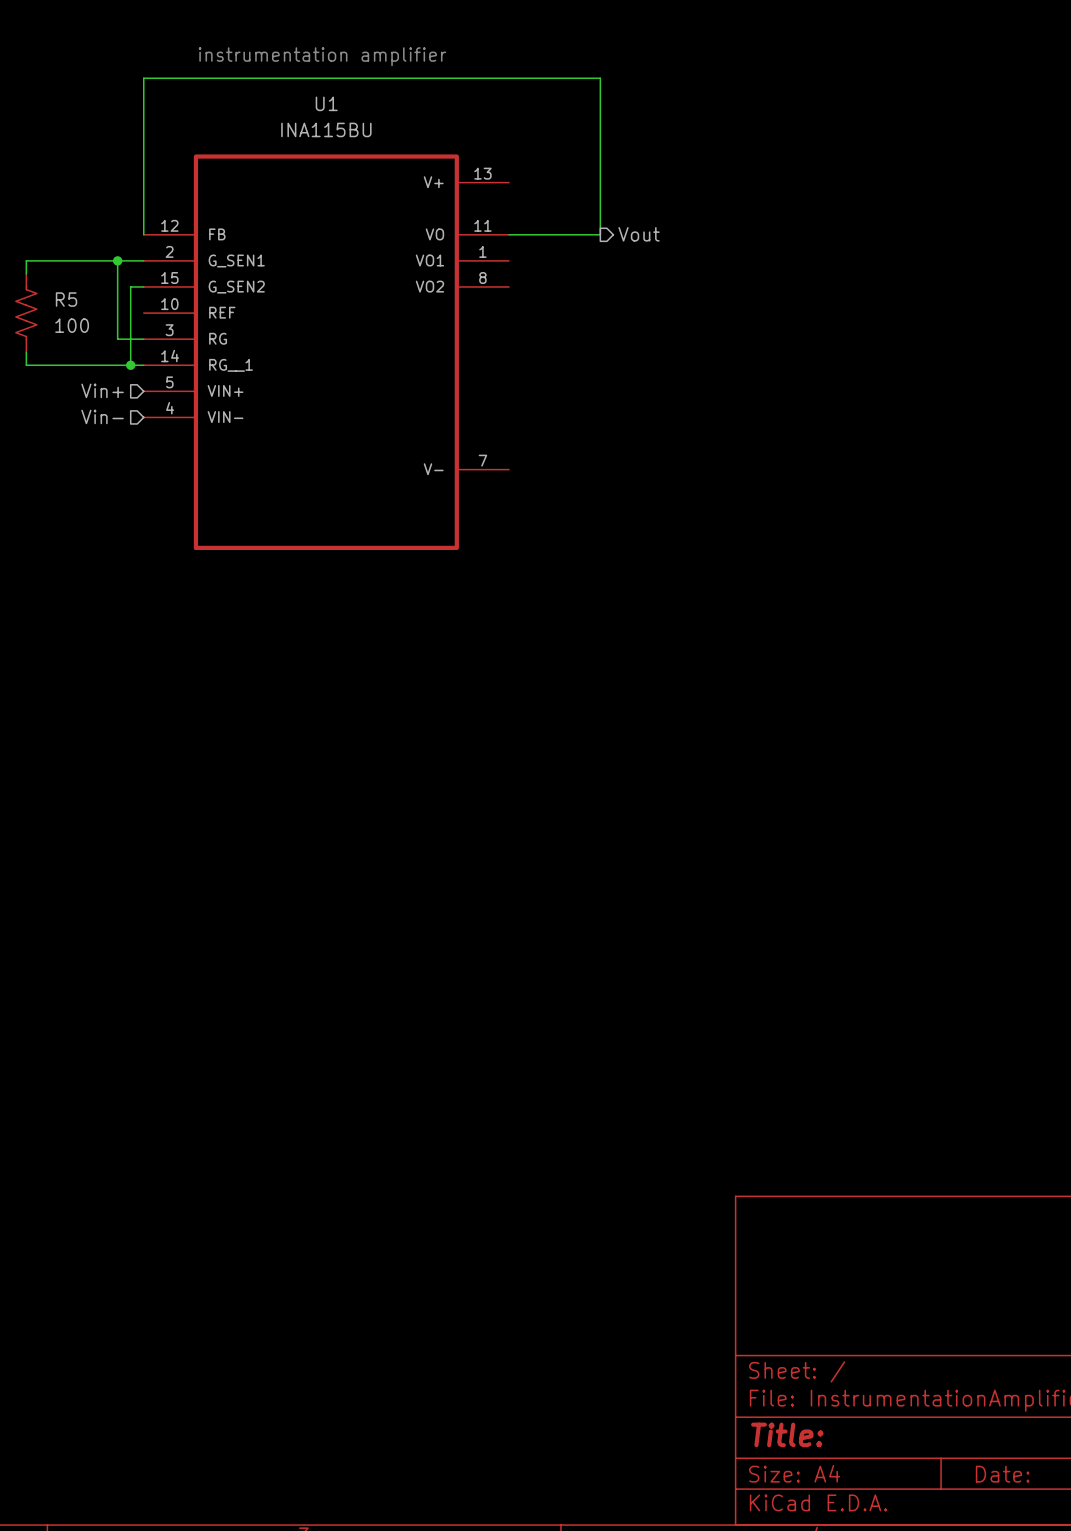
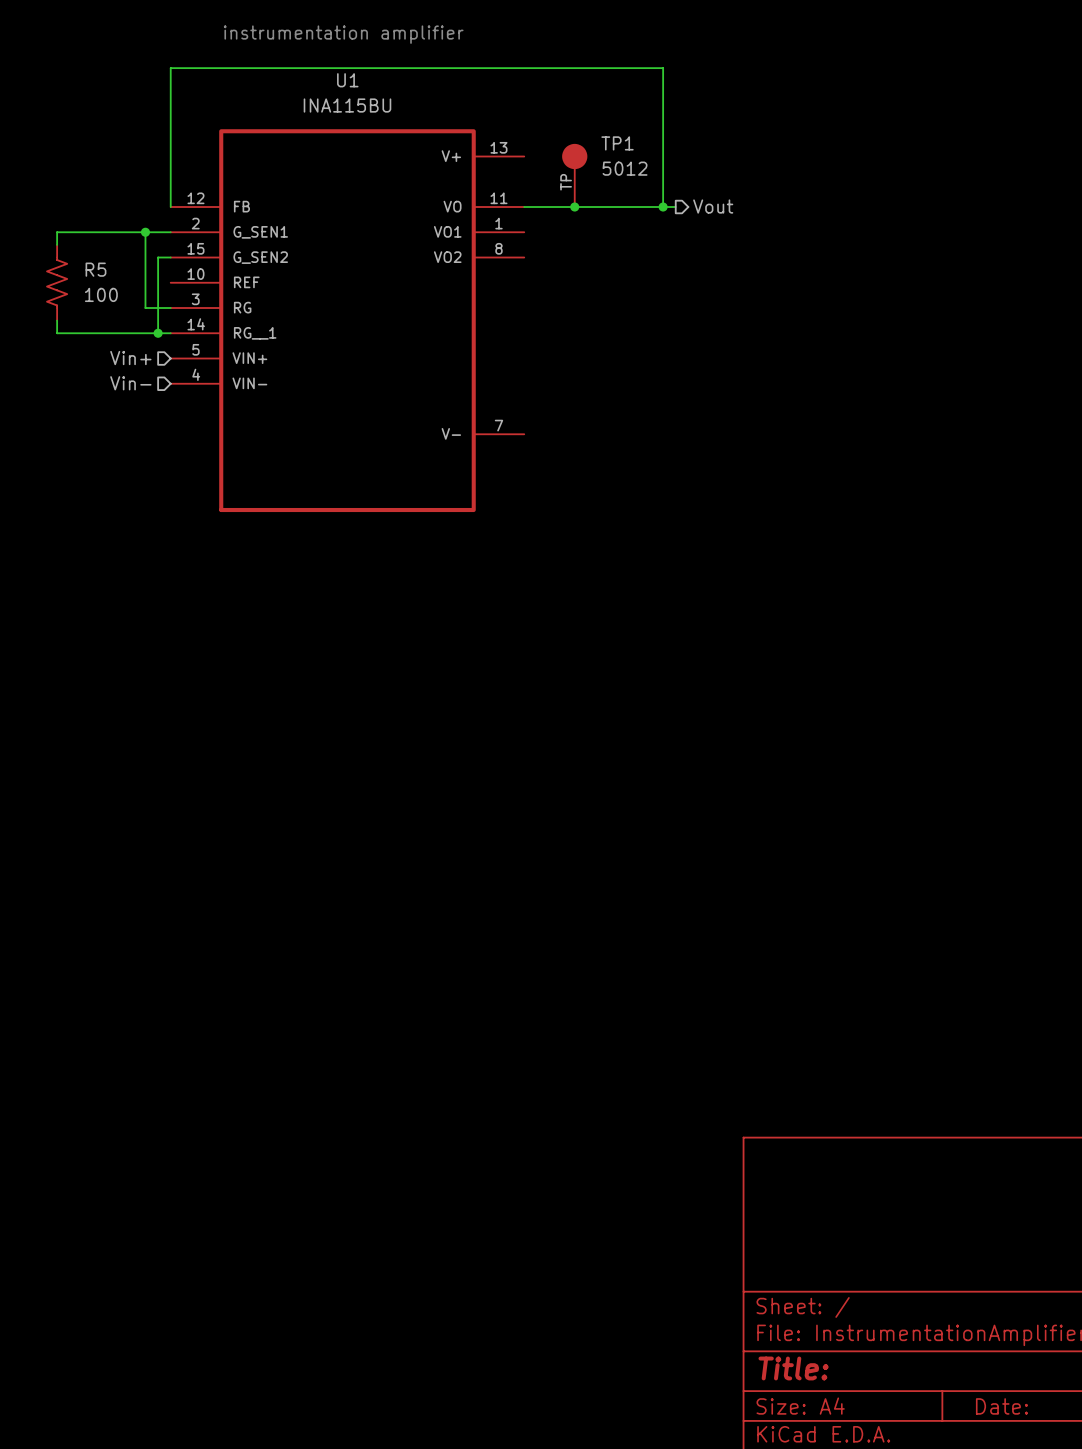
wire: (143, 91) (143, 78) (600, 78) (600, 234) -> (170, 68) (663, 68) (663, 207)
TP1: none -> 5012 (574, 175)
junction: none -> (574, 207)
wire: none -> (612, 207) (675, 207)
hierarchical label position: Vout (639, 234) -> Vout (713, 206)
junction: none -> (663, 207)

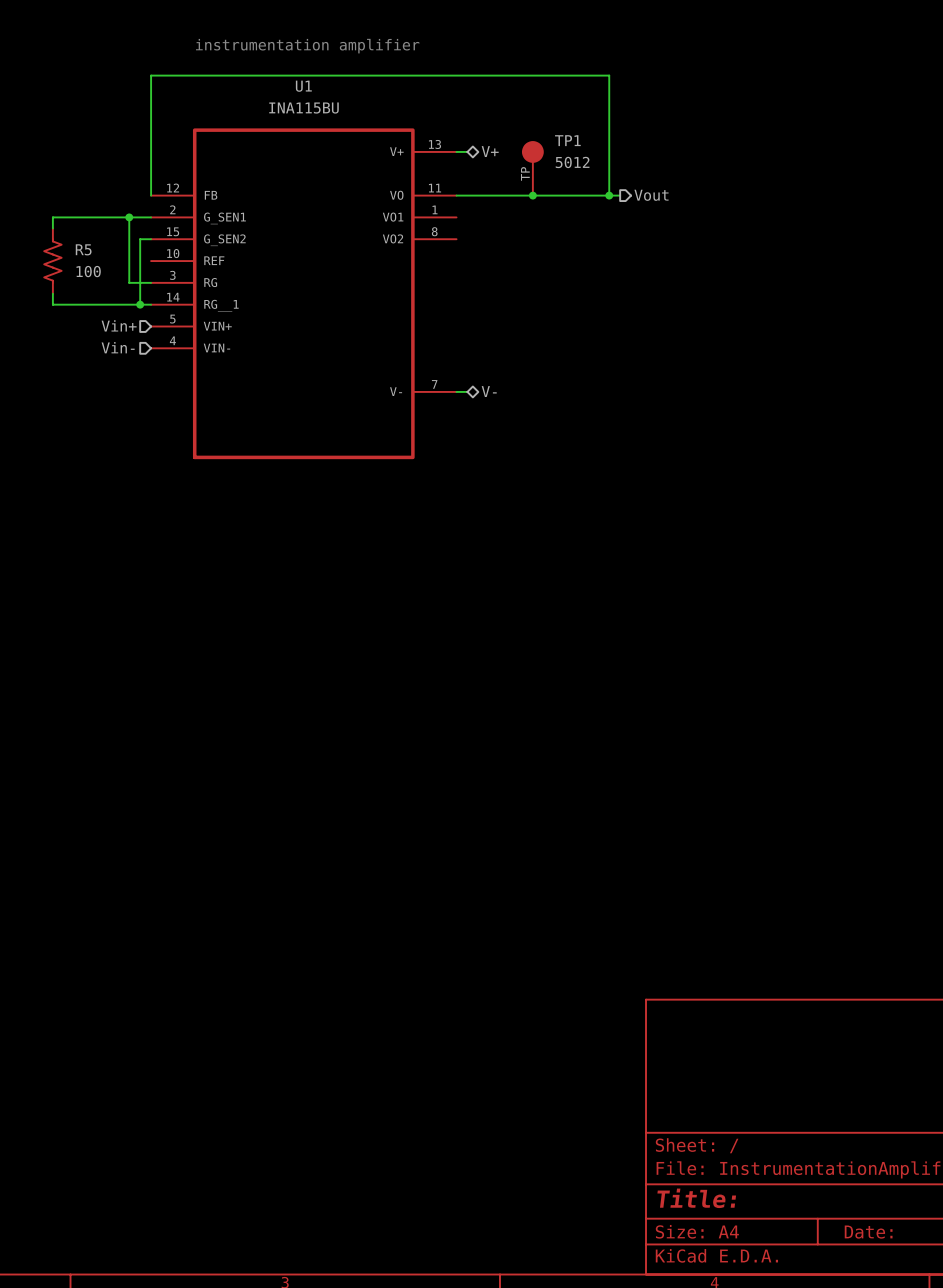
wire: (663, 68) (663, 207) -> (576, 75) (609, 75) (609, 195)
wire: none -> (456, 151) (467, 151)
hierarchical label: none -> V+ (490, 151)
TP1 position: (574, 175) -> (532, 168)
hierarchical label position: Vout (713, 206) -> Vout (651, 195)
junction: (574, 207) -> none
junction: none -> (532, 195)
junction: (663, 207) -> none
wire: none -> (587, 195) (620, 195)
junction: none -> (609, 195)
hierarchical label: none -> V- (489, 391)
wire: none -> (456, 391) (467, 391)

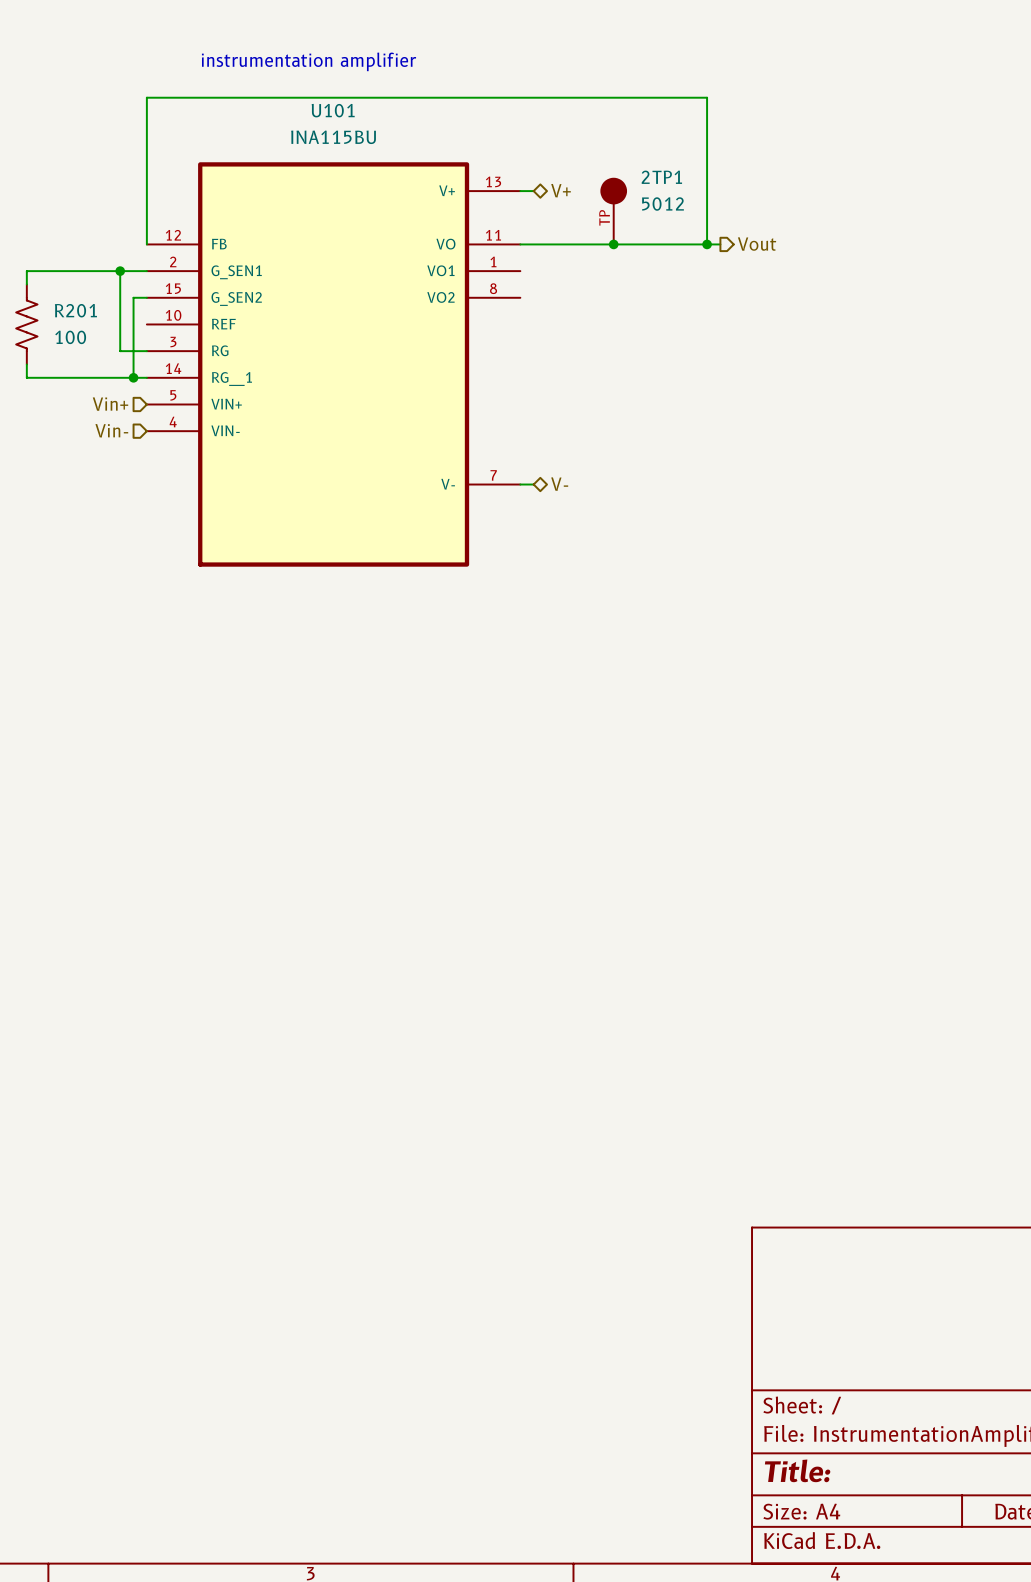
U1 name: U1 (303, 86) -> U101 (333, 110)
TP1 name: TP1 (567, 140) -> 2TP1 (661, 177)
R5 name: R5 (83, 249) -> R201 (75, 310)

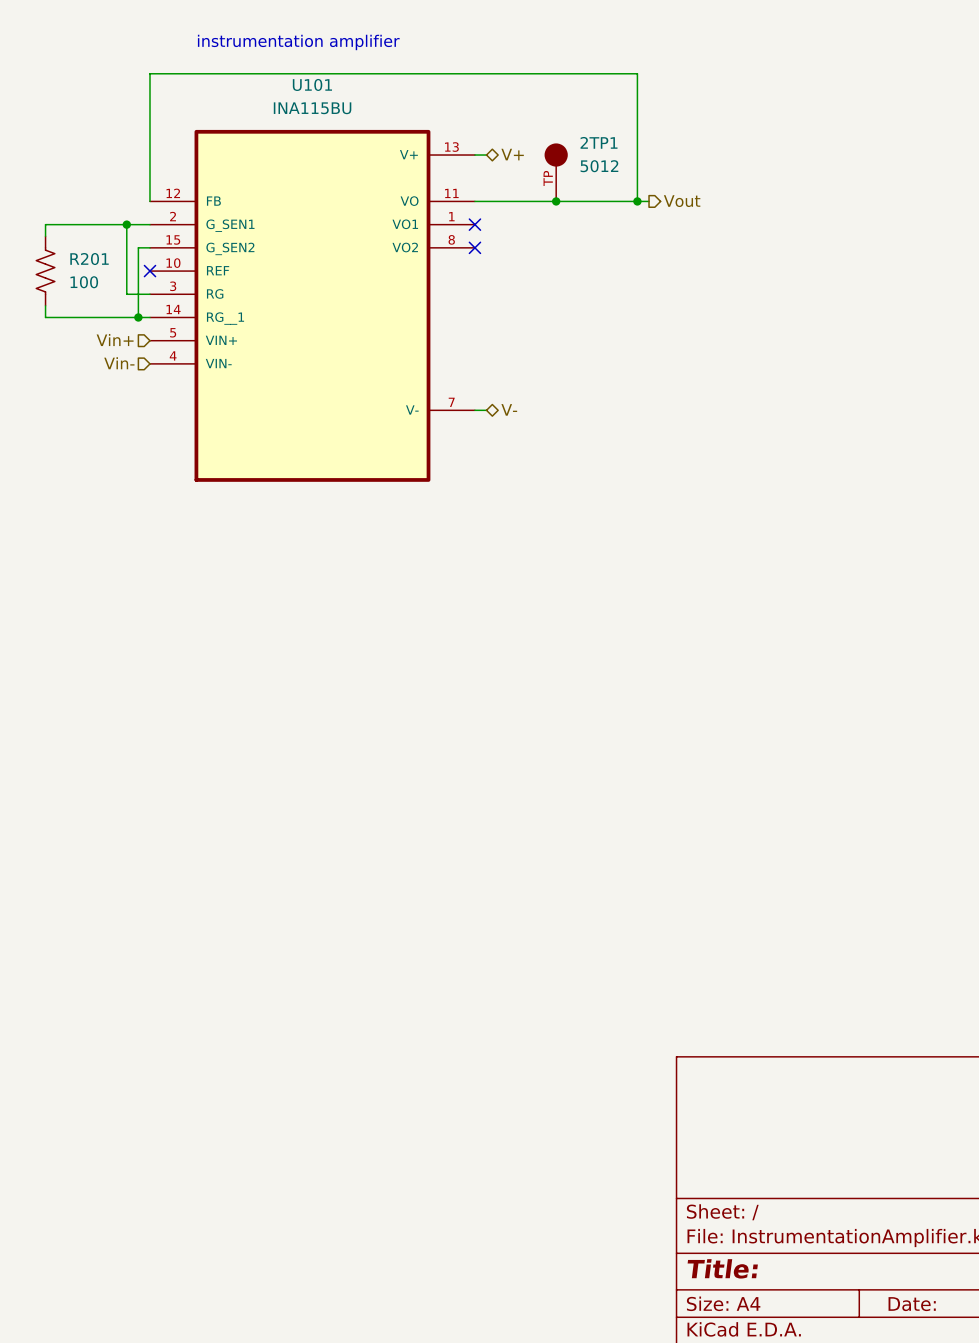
no-connect mark: none -> (474, 224)
no-connect mark: none -> (474, 247)
no-connect mark: none -> (149, 271)

